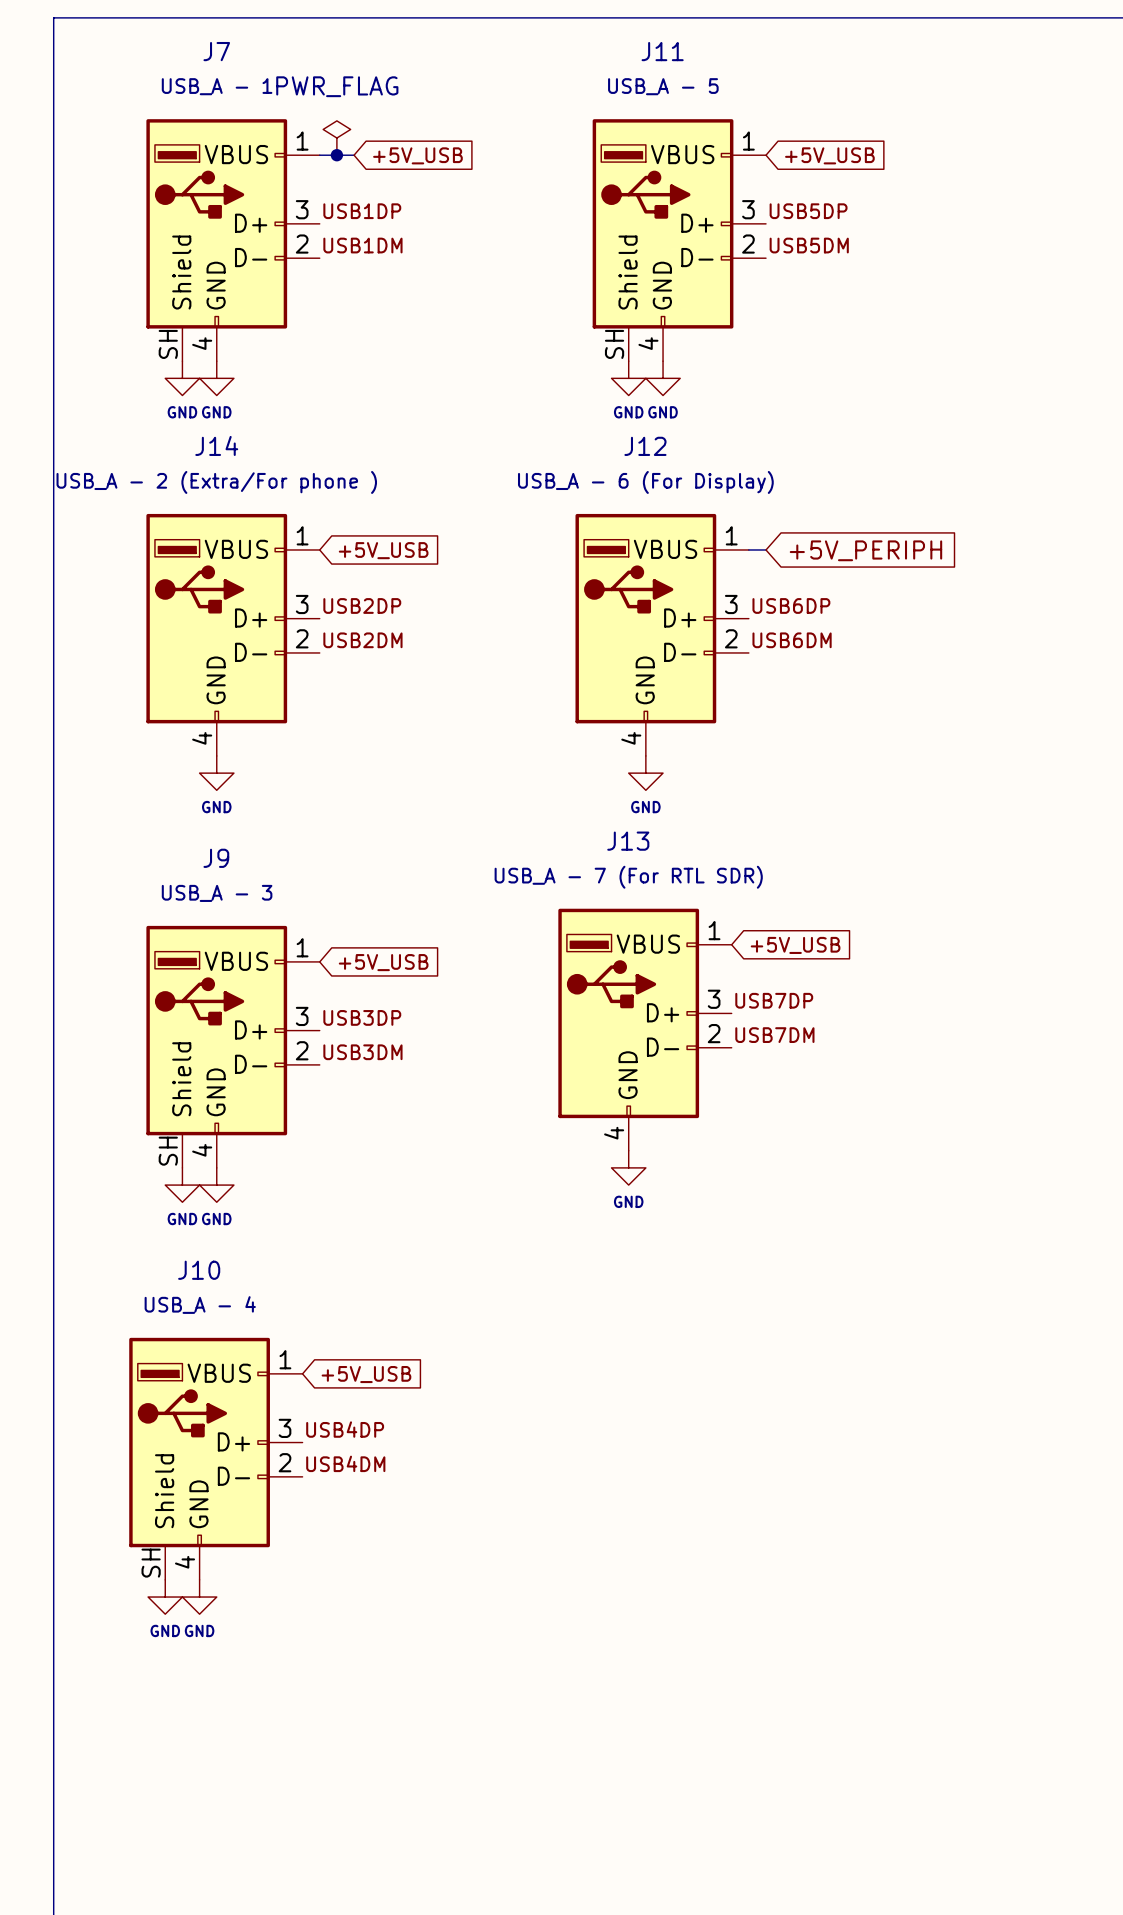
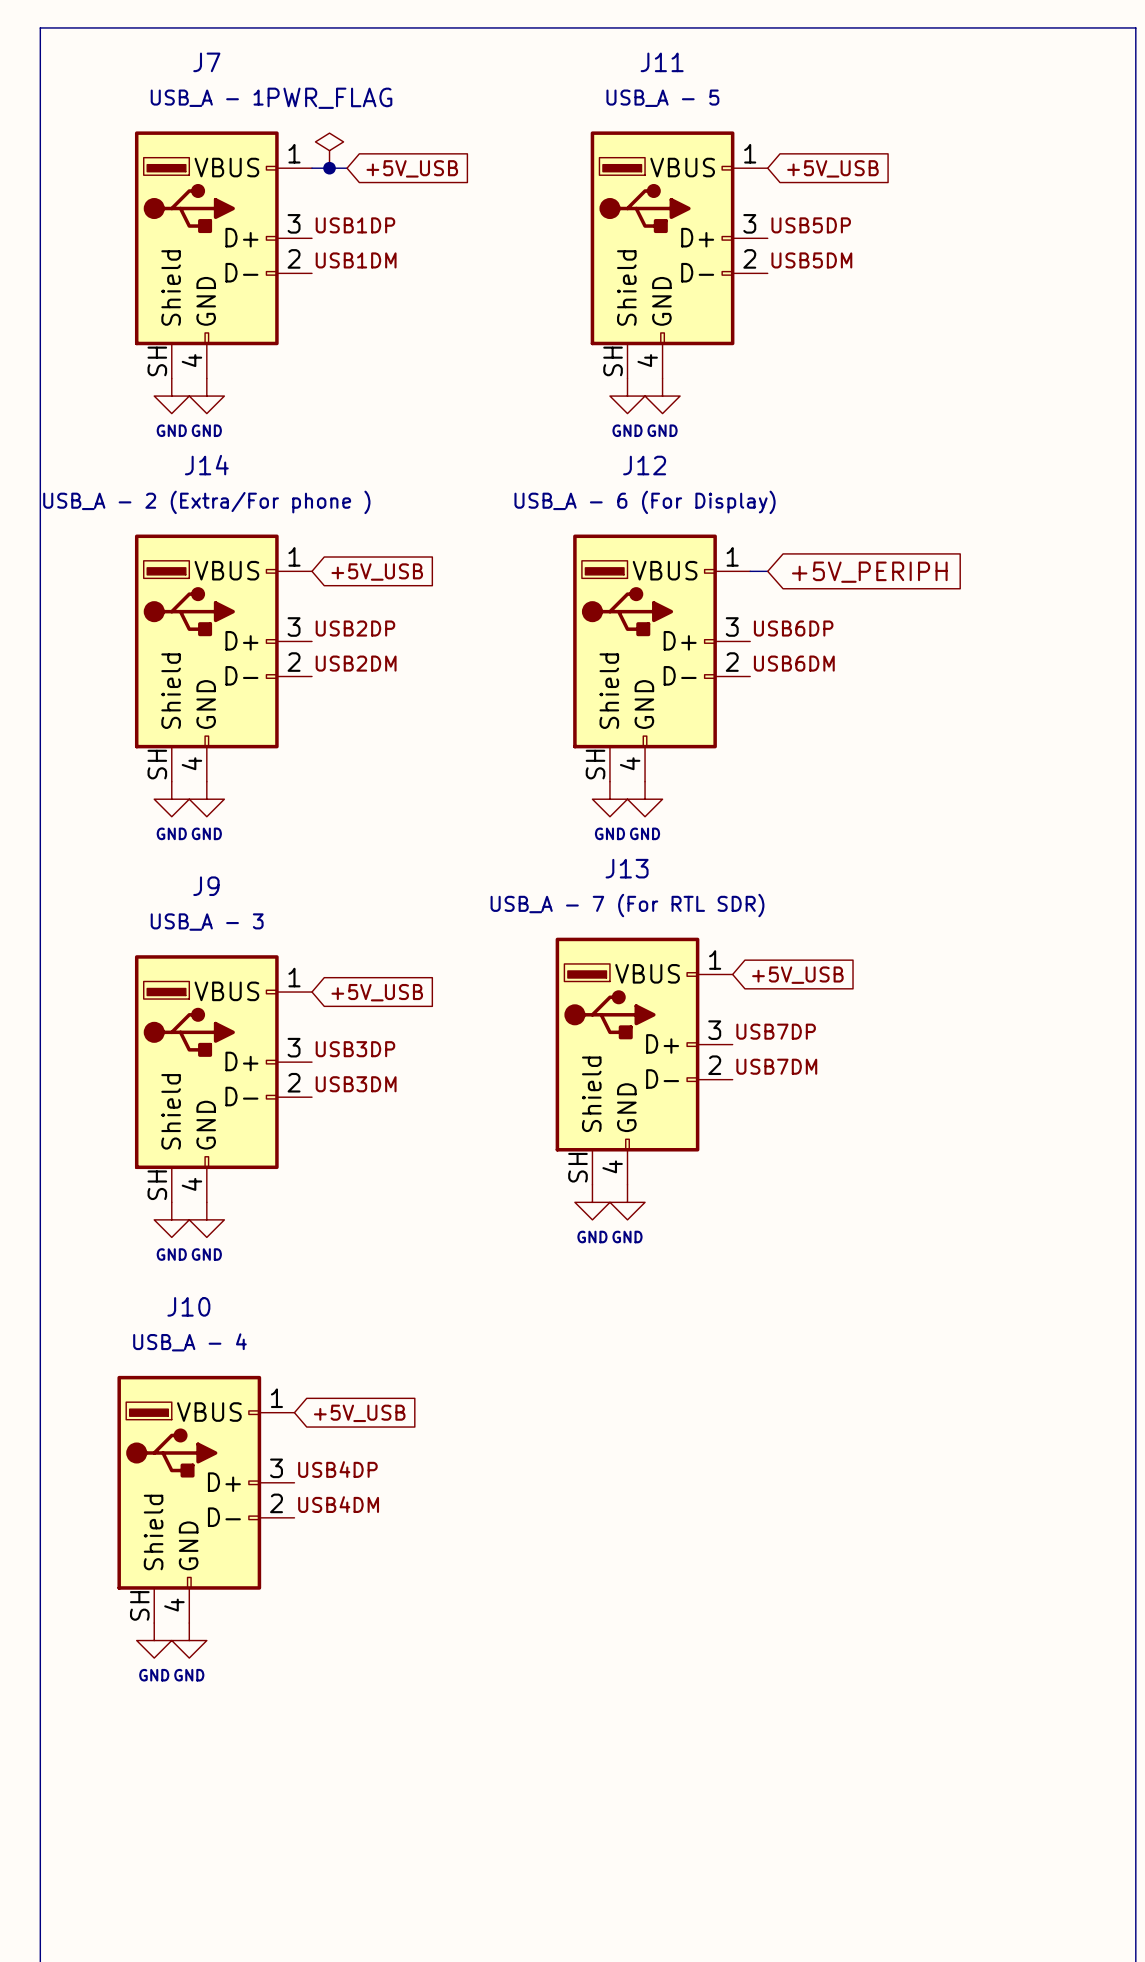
J14 symbol: [146, 513, 320, 756] -> [134, 534, 312, 782]
J12 symbol: [575, 513, 749, 756] -> [573, 534, 751, 782]
power symbol: none -> GND (171, 799)
power symbol: none -> GND (609, 799)
J13 symbol: [558, 908, 732, 1151] -> [555, 937, 733, 1185]
power symbol: none -> GND (592, 1202)

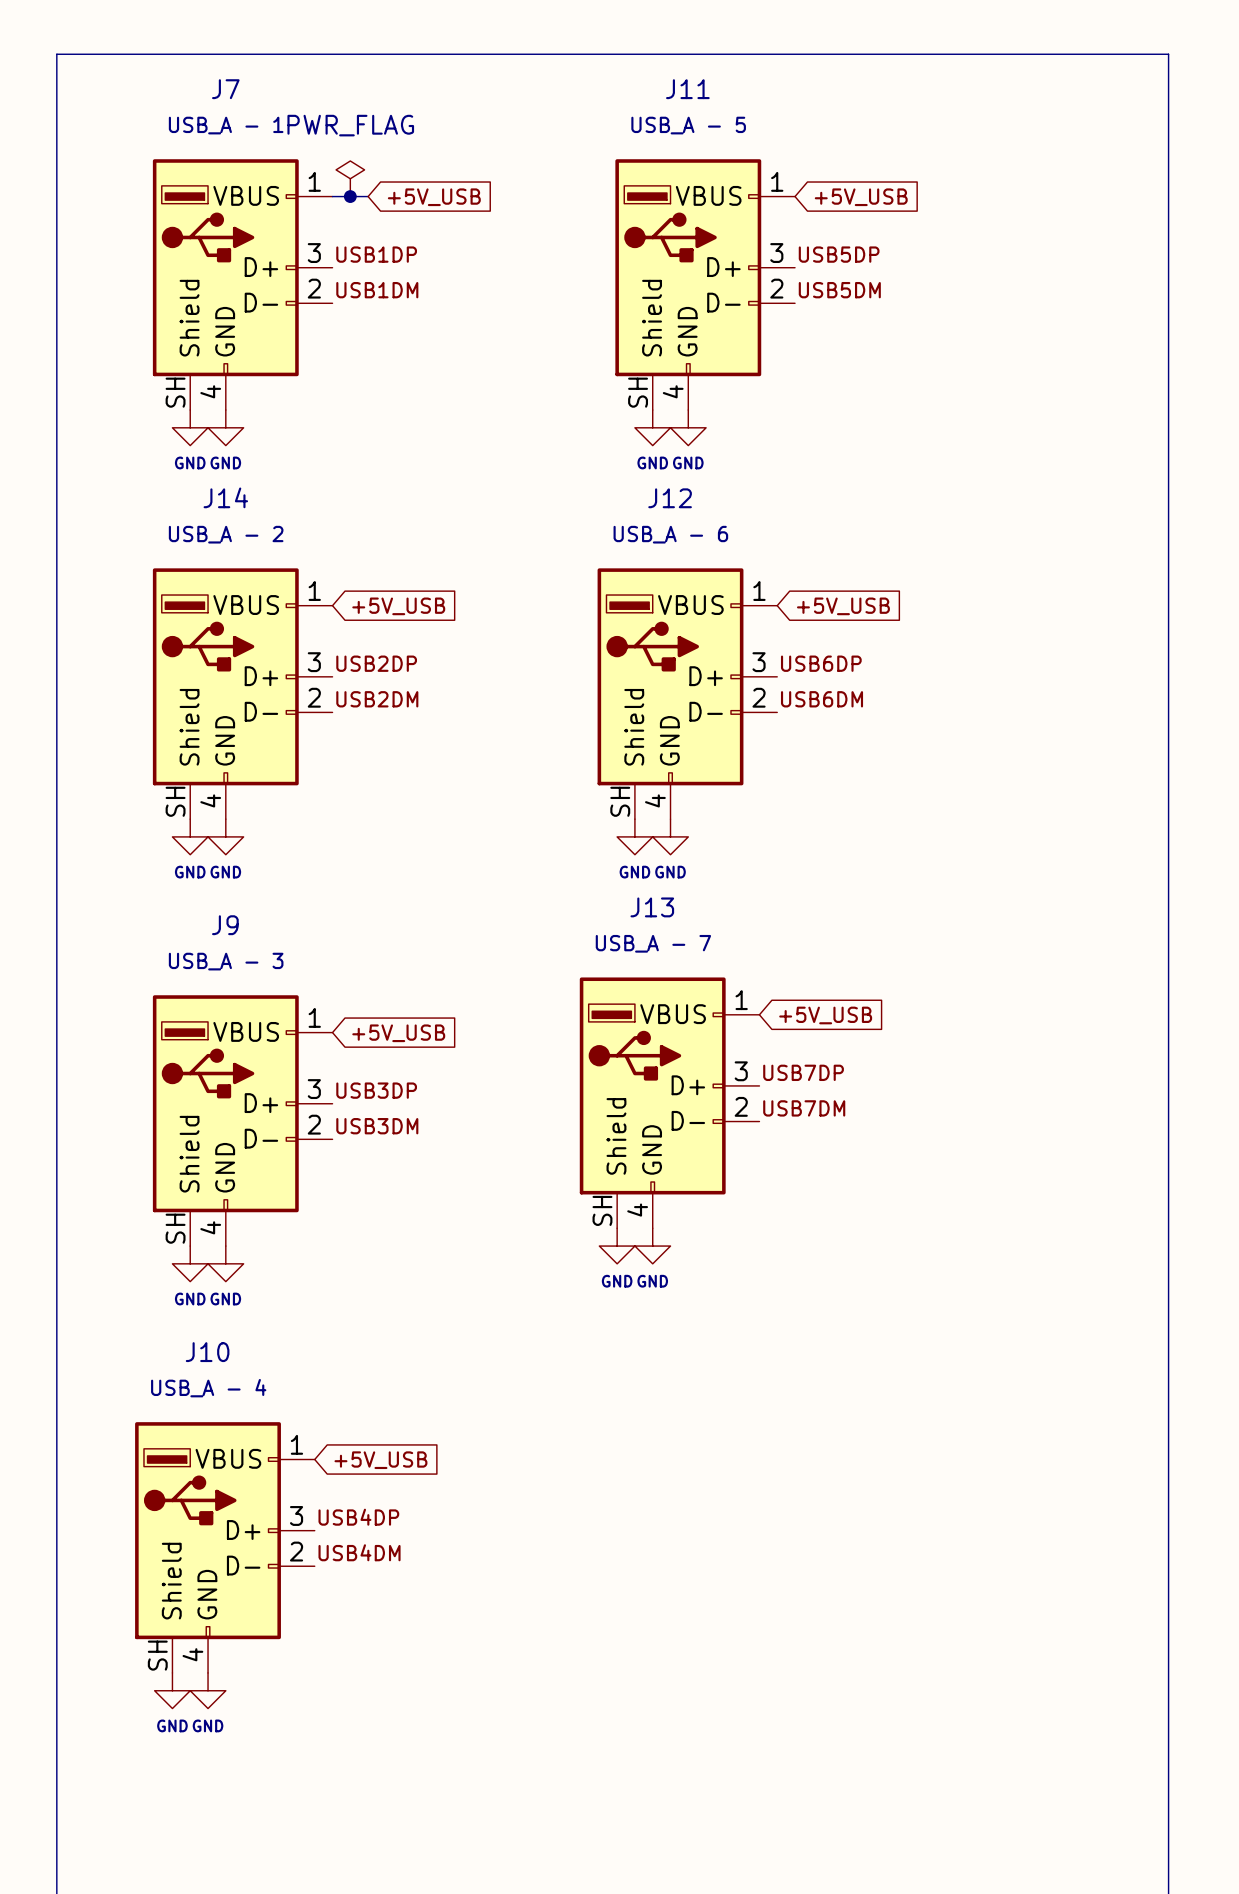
J14 value: USB_A - 2 (Extra/For phone ) (206, 502) -> USB_A - 2 (226, 534)
J12 value: USB_A - 6 (For Display) (645, 502) -> USB_A - 6 (670, 534)
wire: (750, 571) (767, 571) -> none
global label: none -> +5V_USB (843, 606)
global label: +5V_PERIPH (869, 572) -> none
J13 value: USB_A - 7 (For RTL SDR) (627, 905) -> USB_A - 7 (653, 943)

